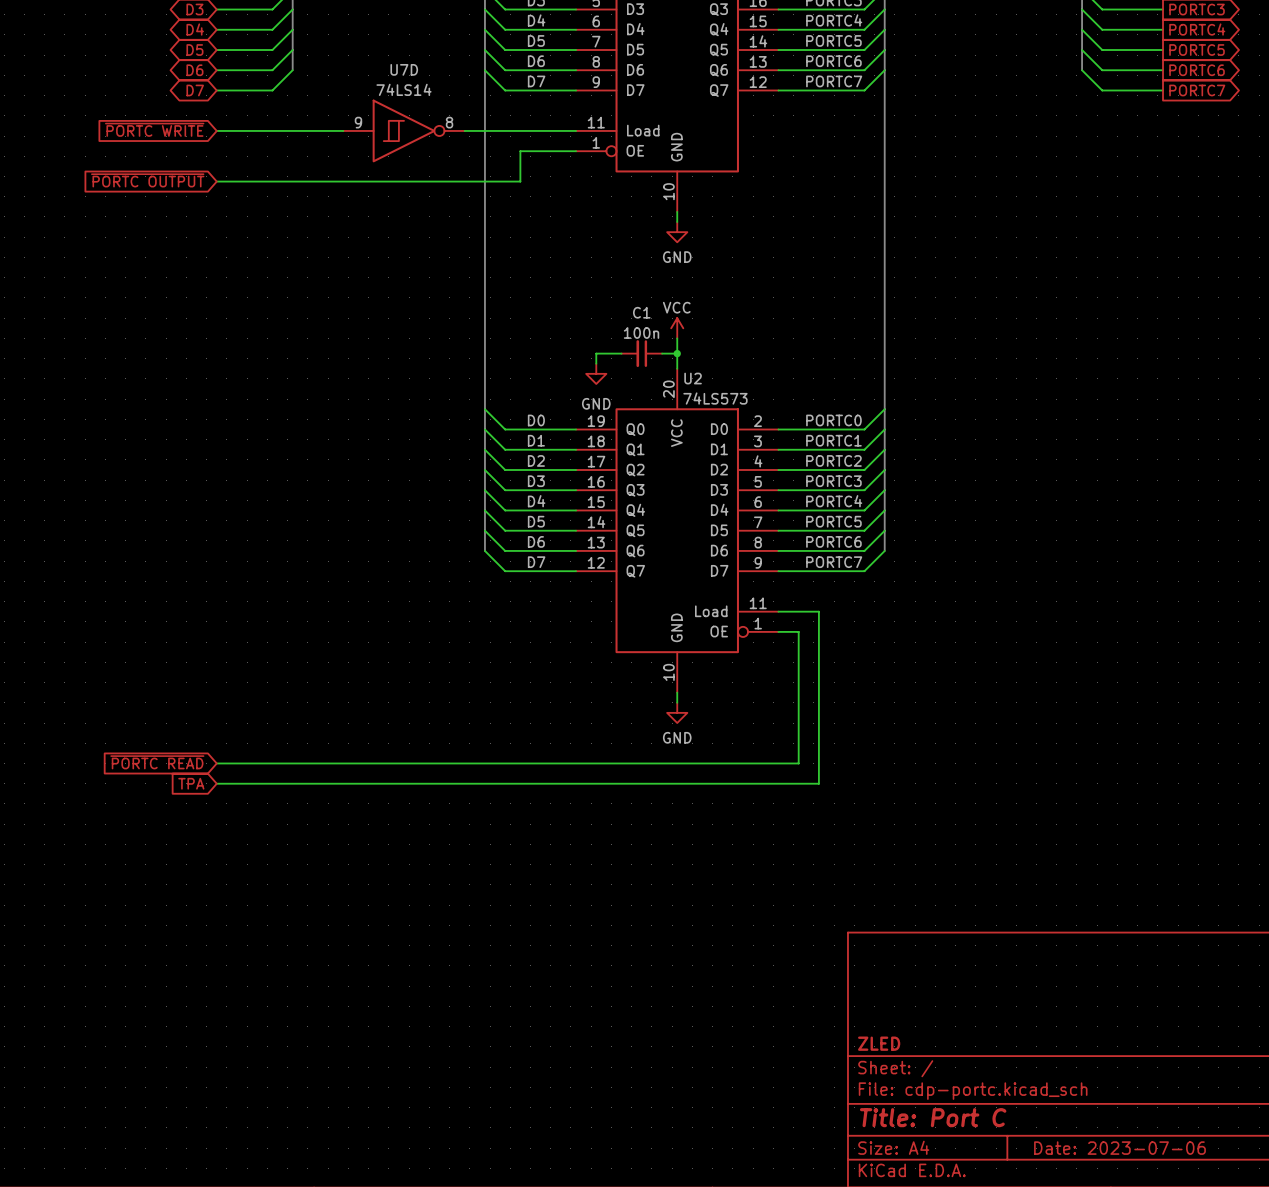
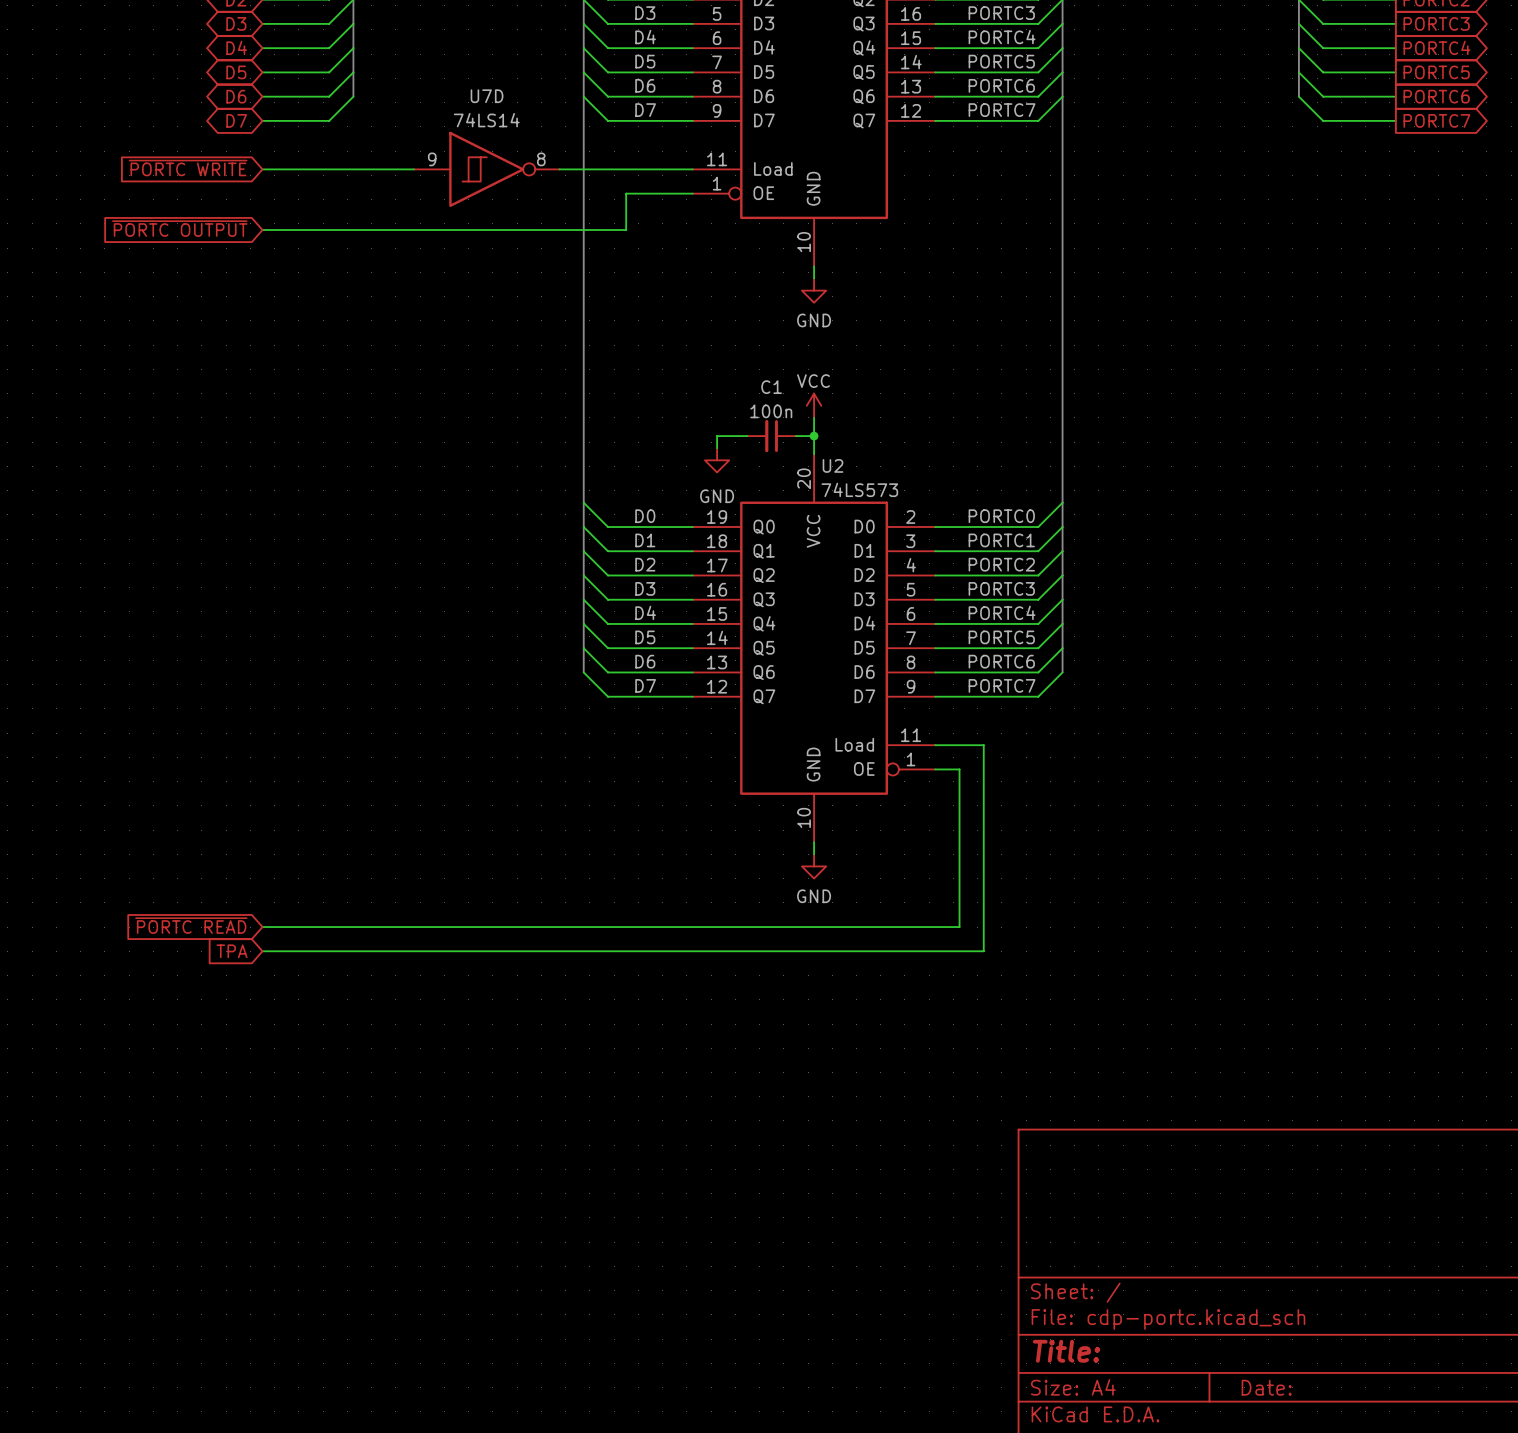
title block: ZLED (879, 1043) -> none
title block: Title: Port C (933, 1117) -> Title: (1066, 1351)
title block: Date: 2023-07-06 (1119, 1148) -> Date: (1266, 1387)

